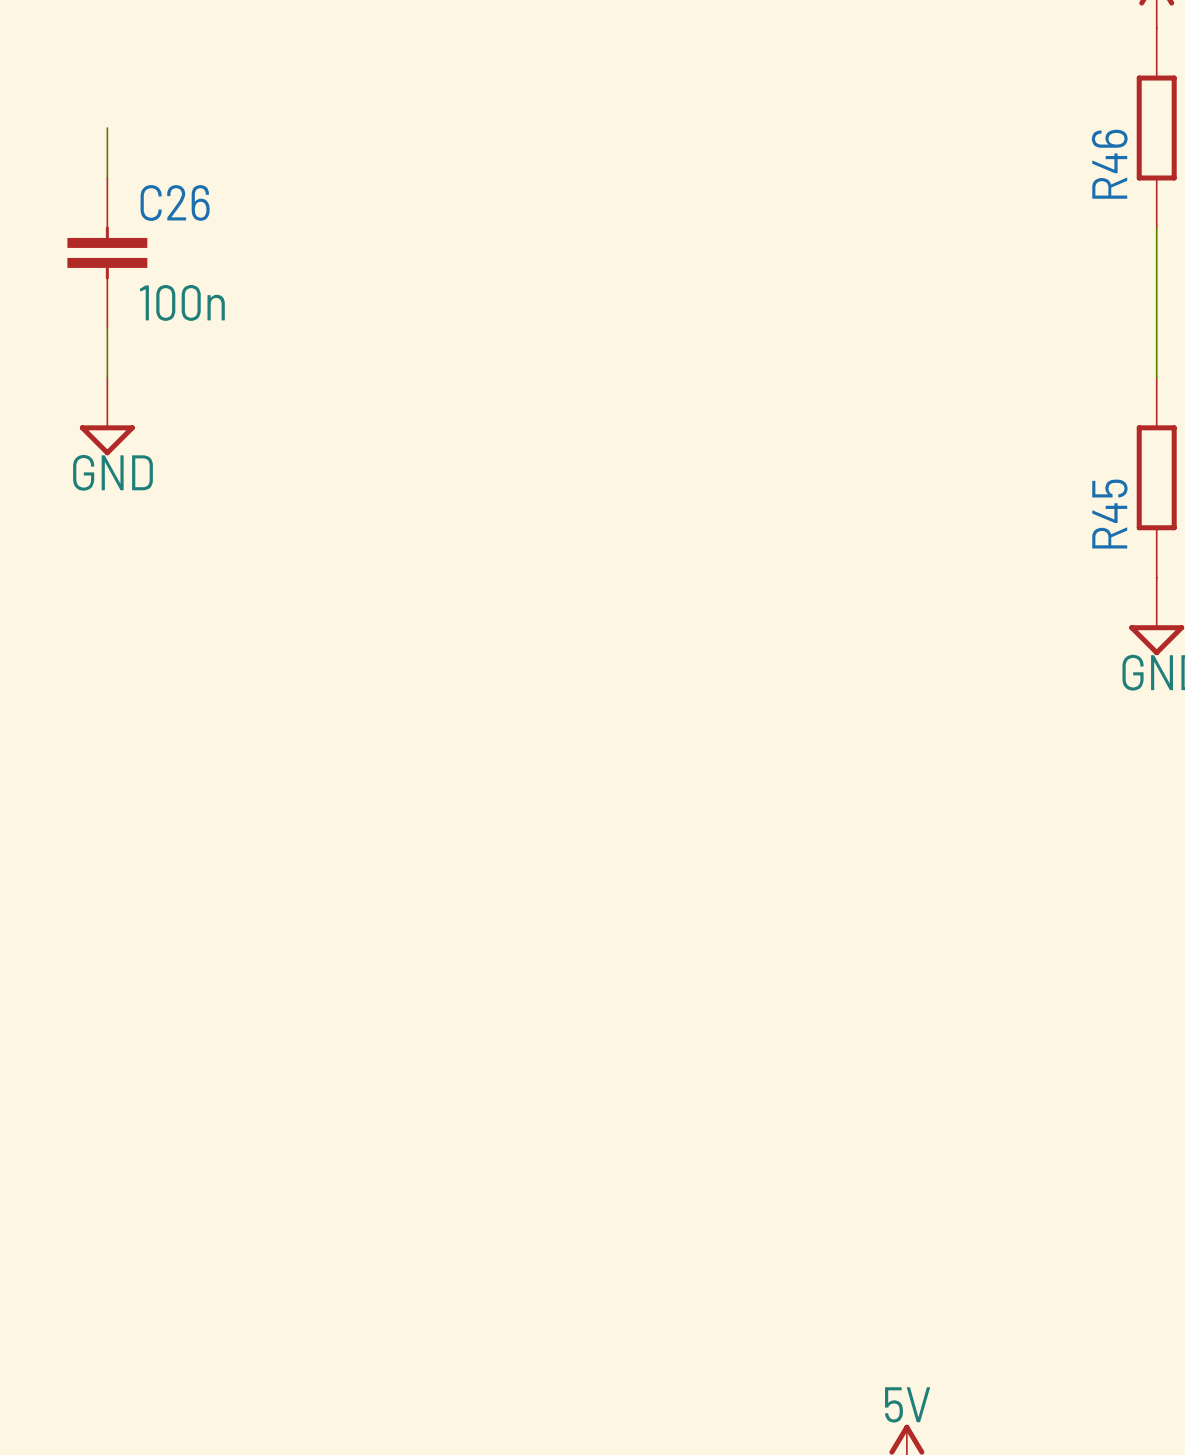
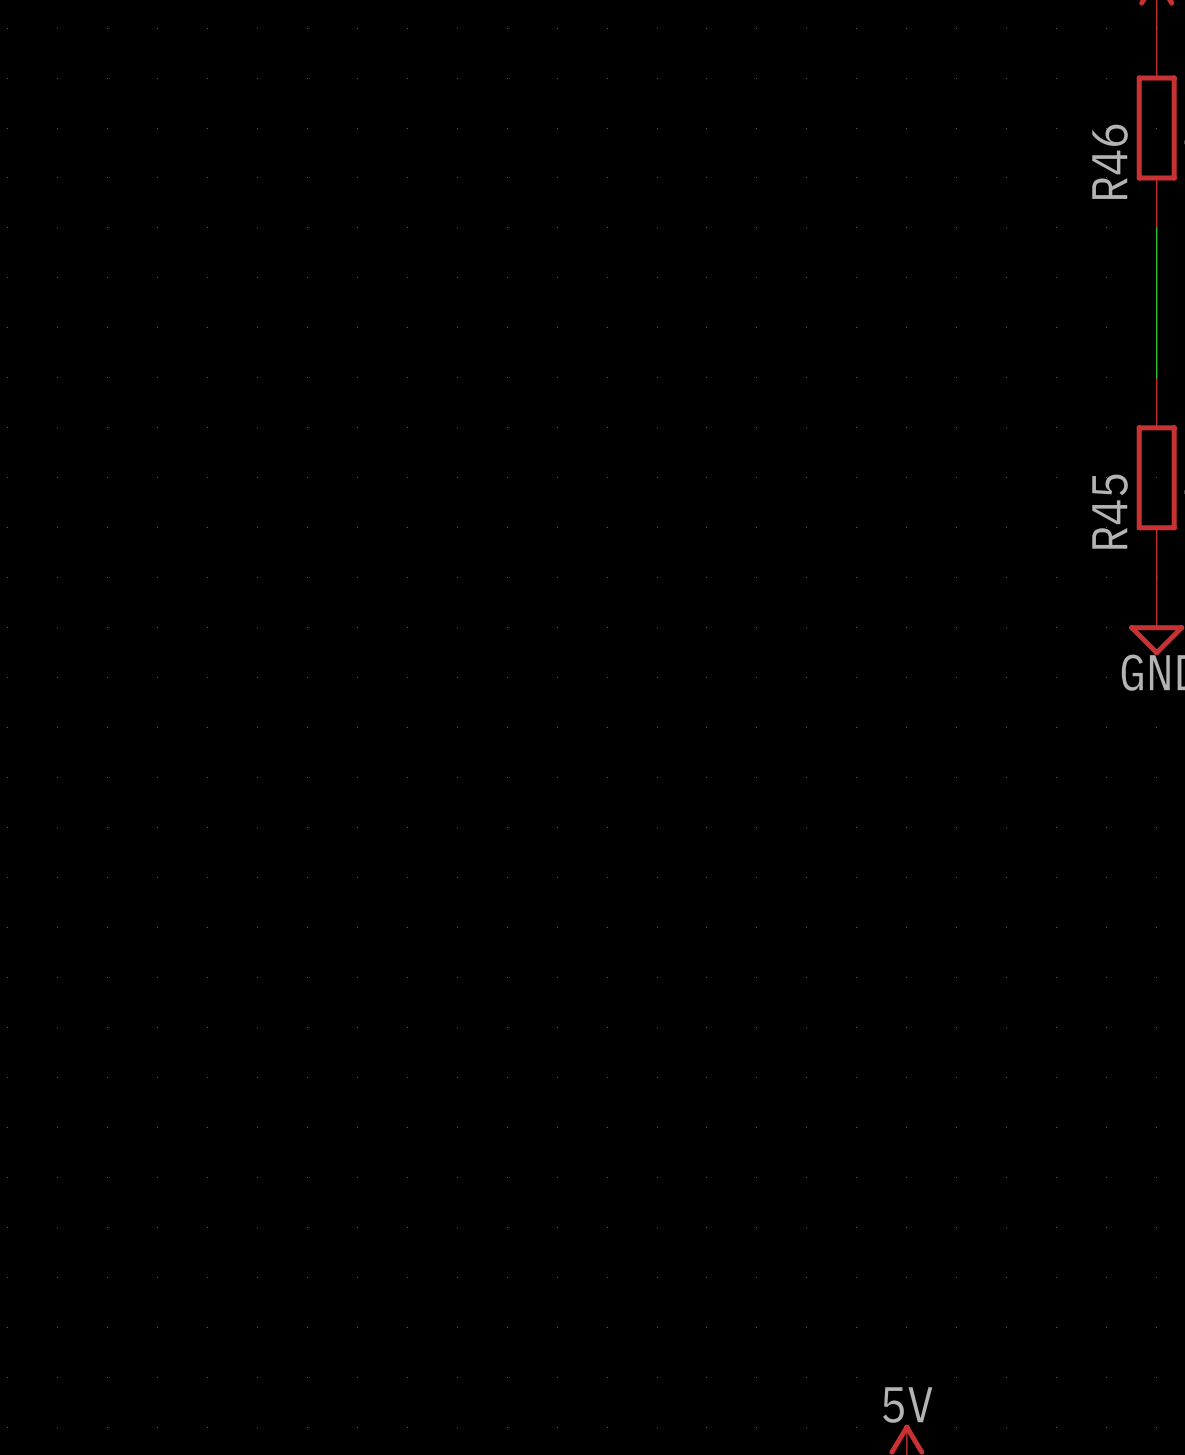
wire: (107, 128) (107, 177) -> none
C26: 100n (107, 252) -> none
wire: (107, 327) (107, 377) -> none
power symbol: GND (107, 416) -> none

